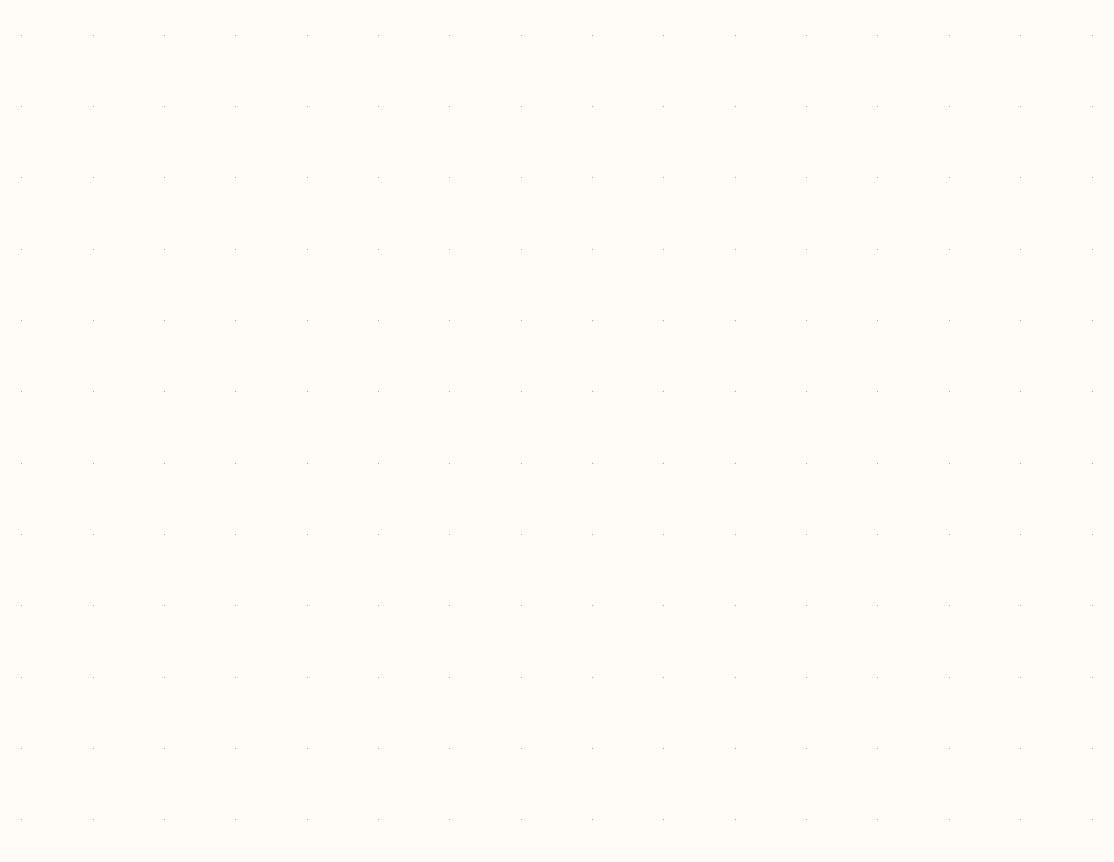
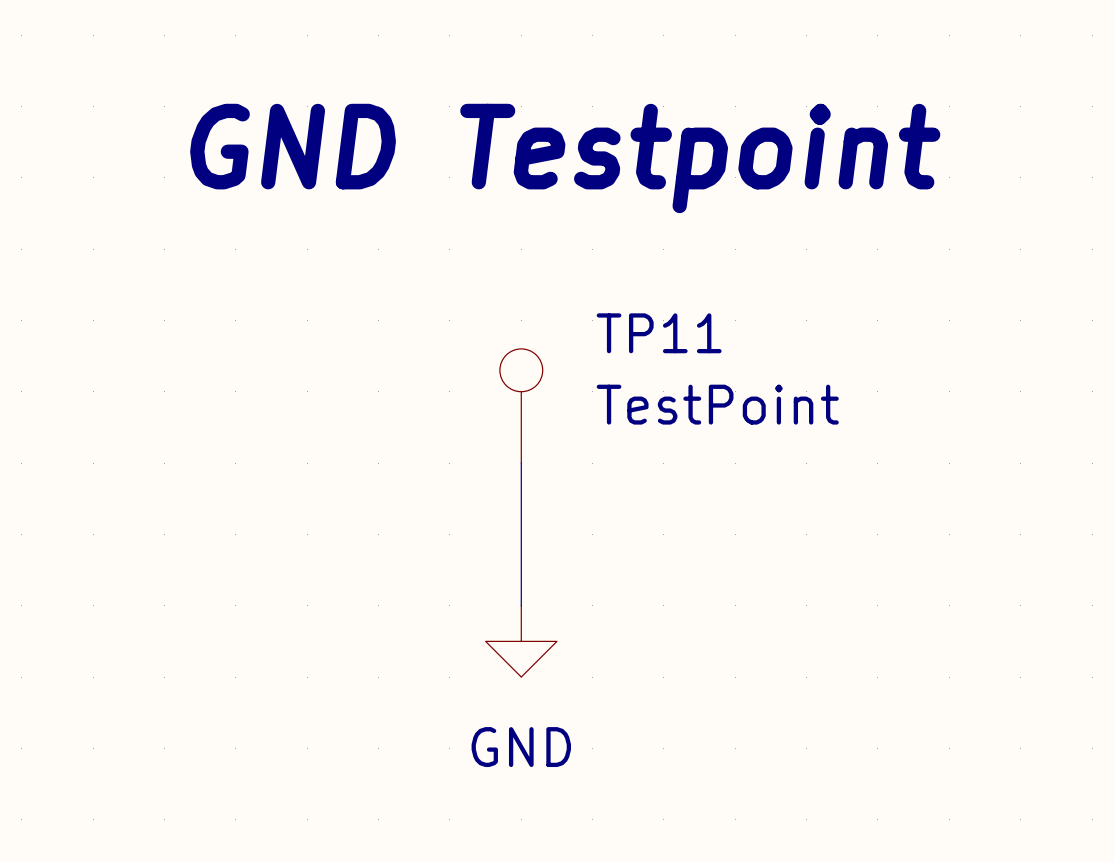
text: none -> GND Testpoint (565, 158)
TP11: none -> TestPoint (521, 405)
wire: none -> (521, 463) (521, 605)
power symbol: none -> GND (521, 641)

